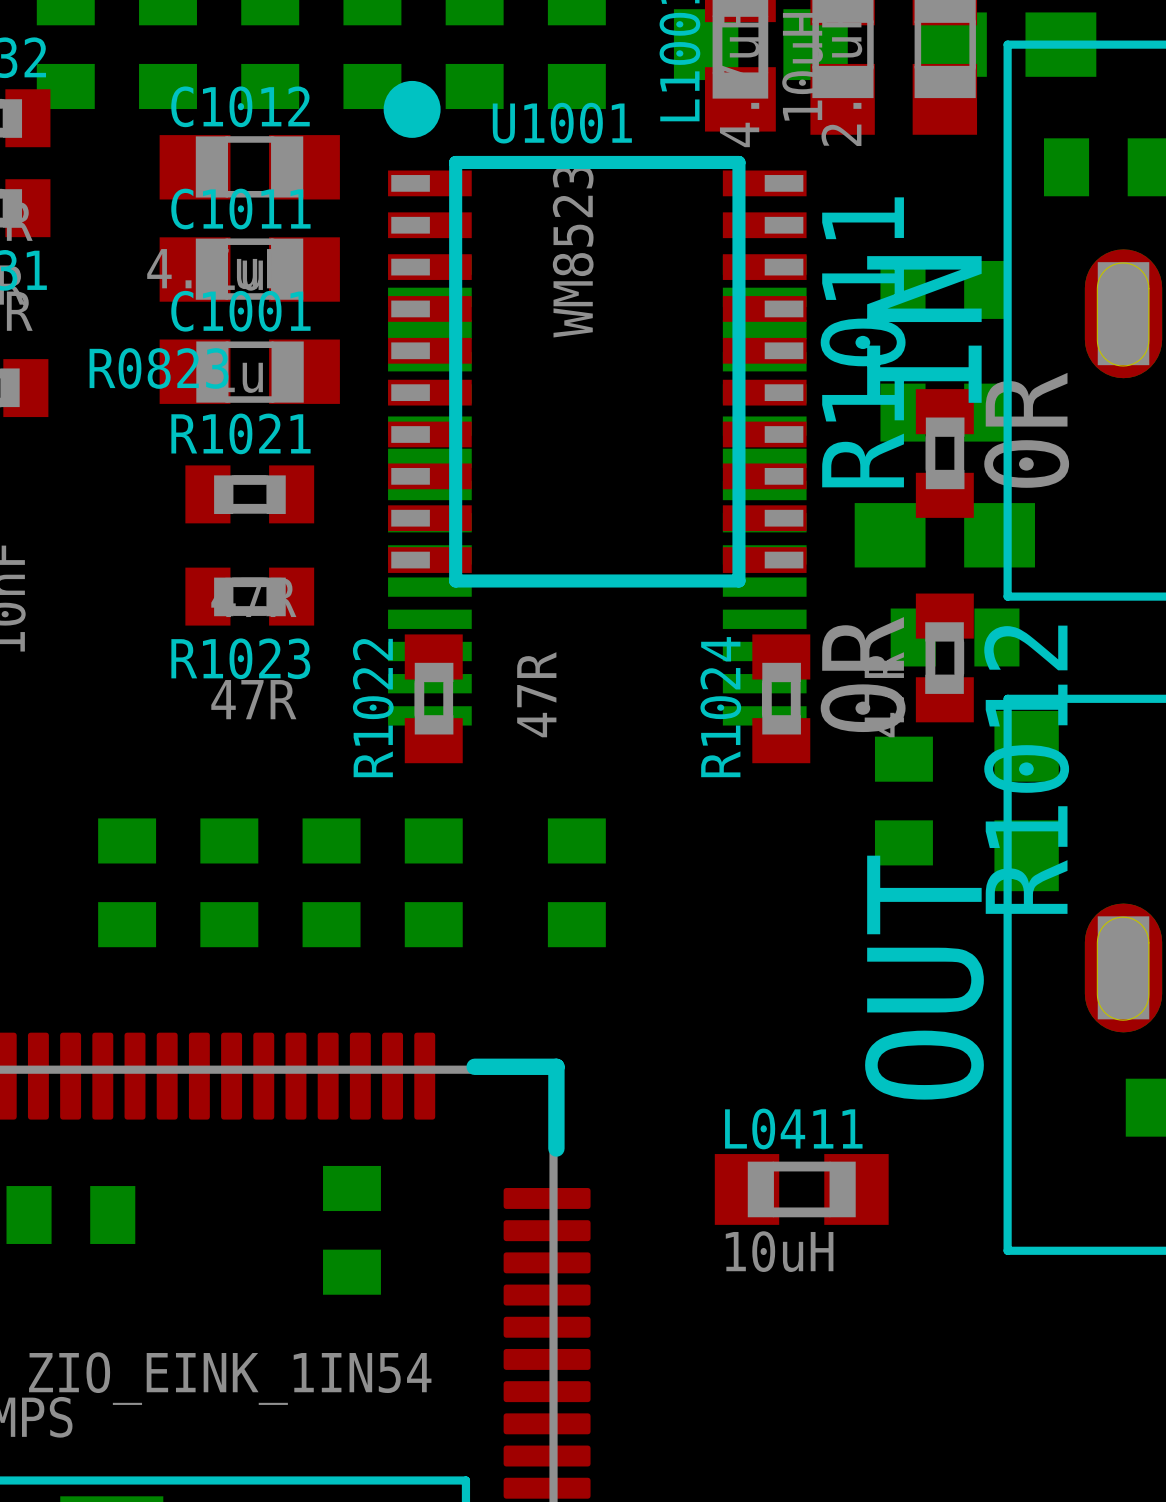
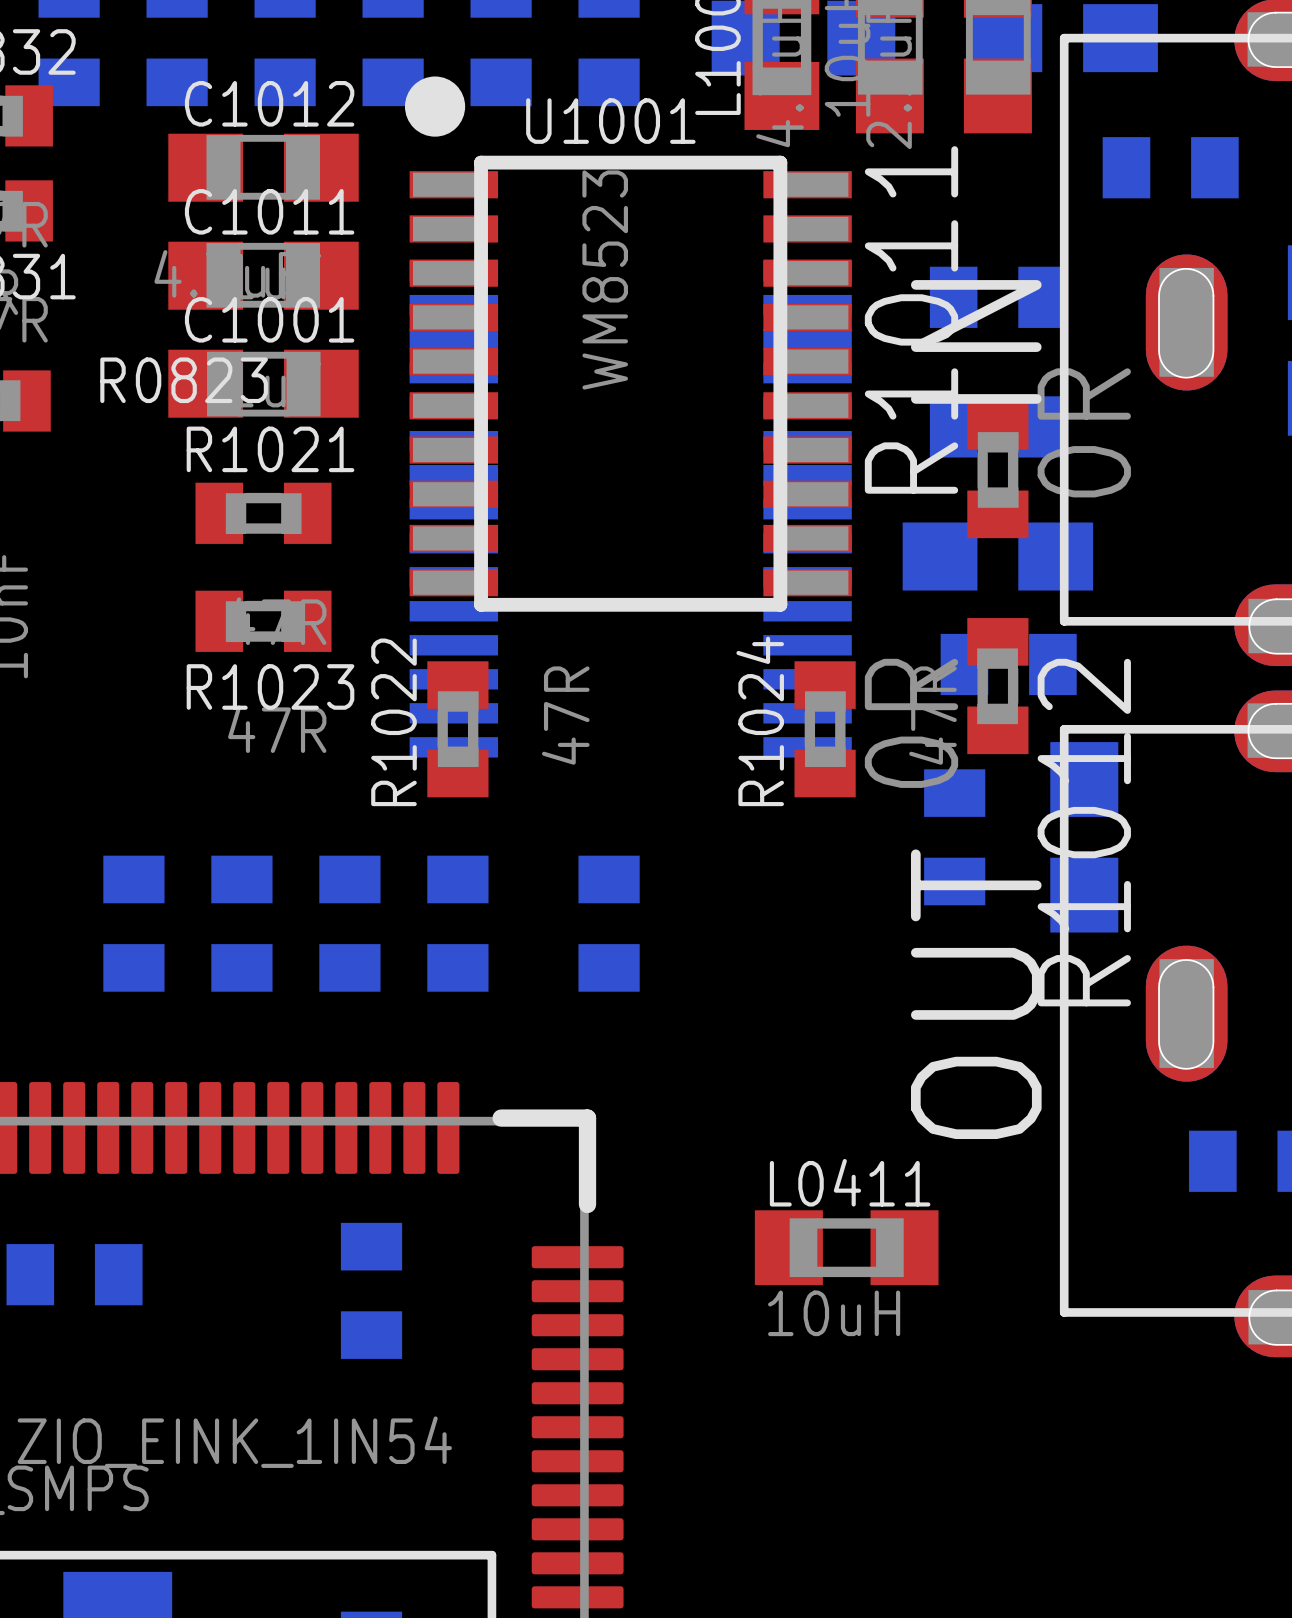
U1001 footprint: [383, 80, 807, 588] -> [404, 76, 852, 612]

